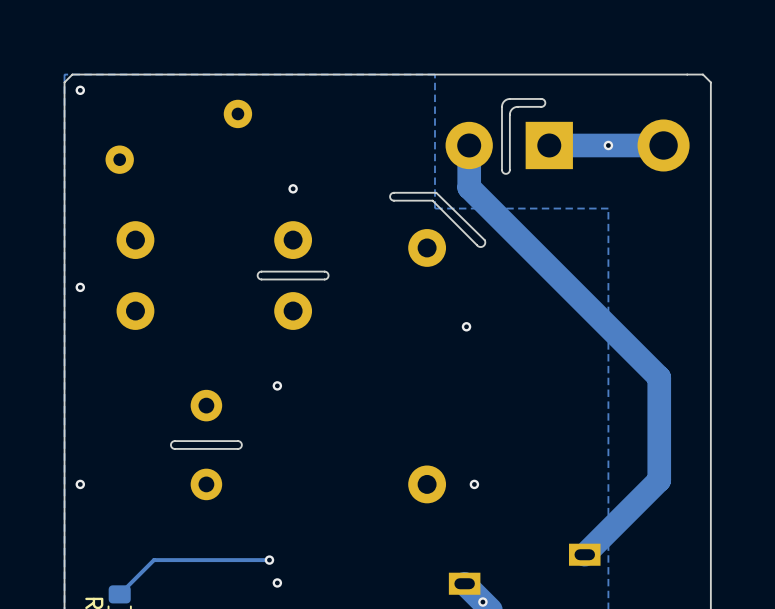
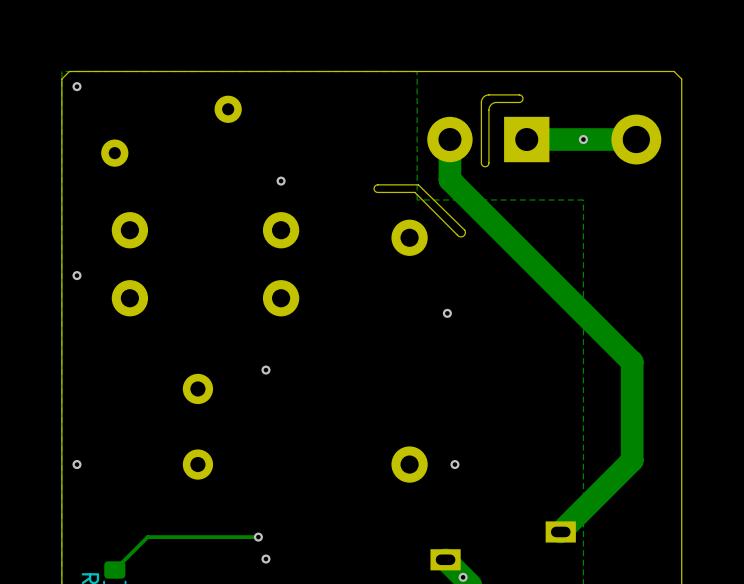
board edge: (324, 271) (261, 271) (257, 275) (261, 279) (324, 279) (328, 275) (324, 271) -> none
board edge: (237, 441) (174, 441) (170, 445) (174, 448) (237, 448) (241, 445) (237, 441) -> none

